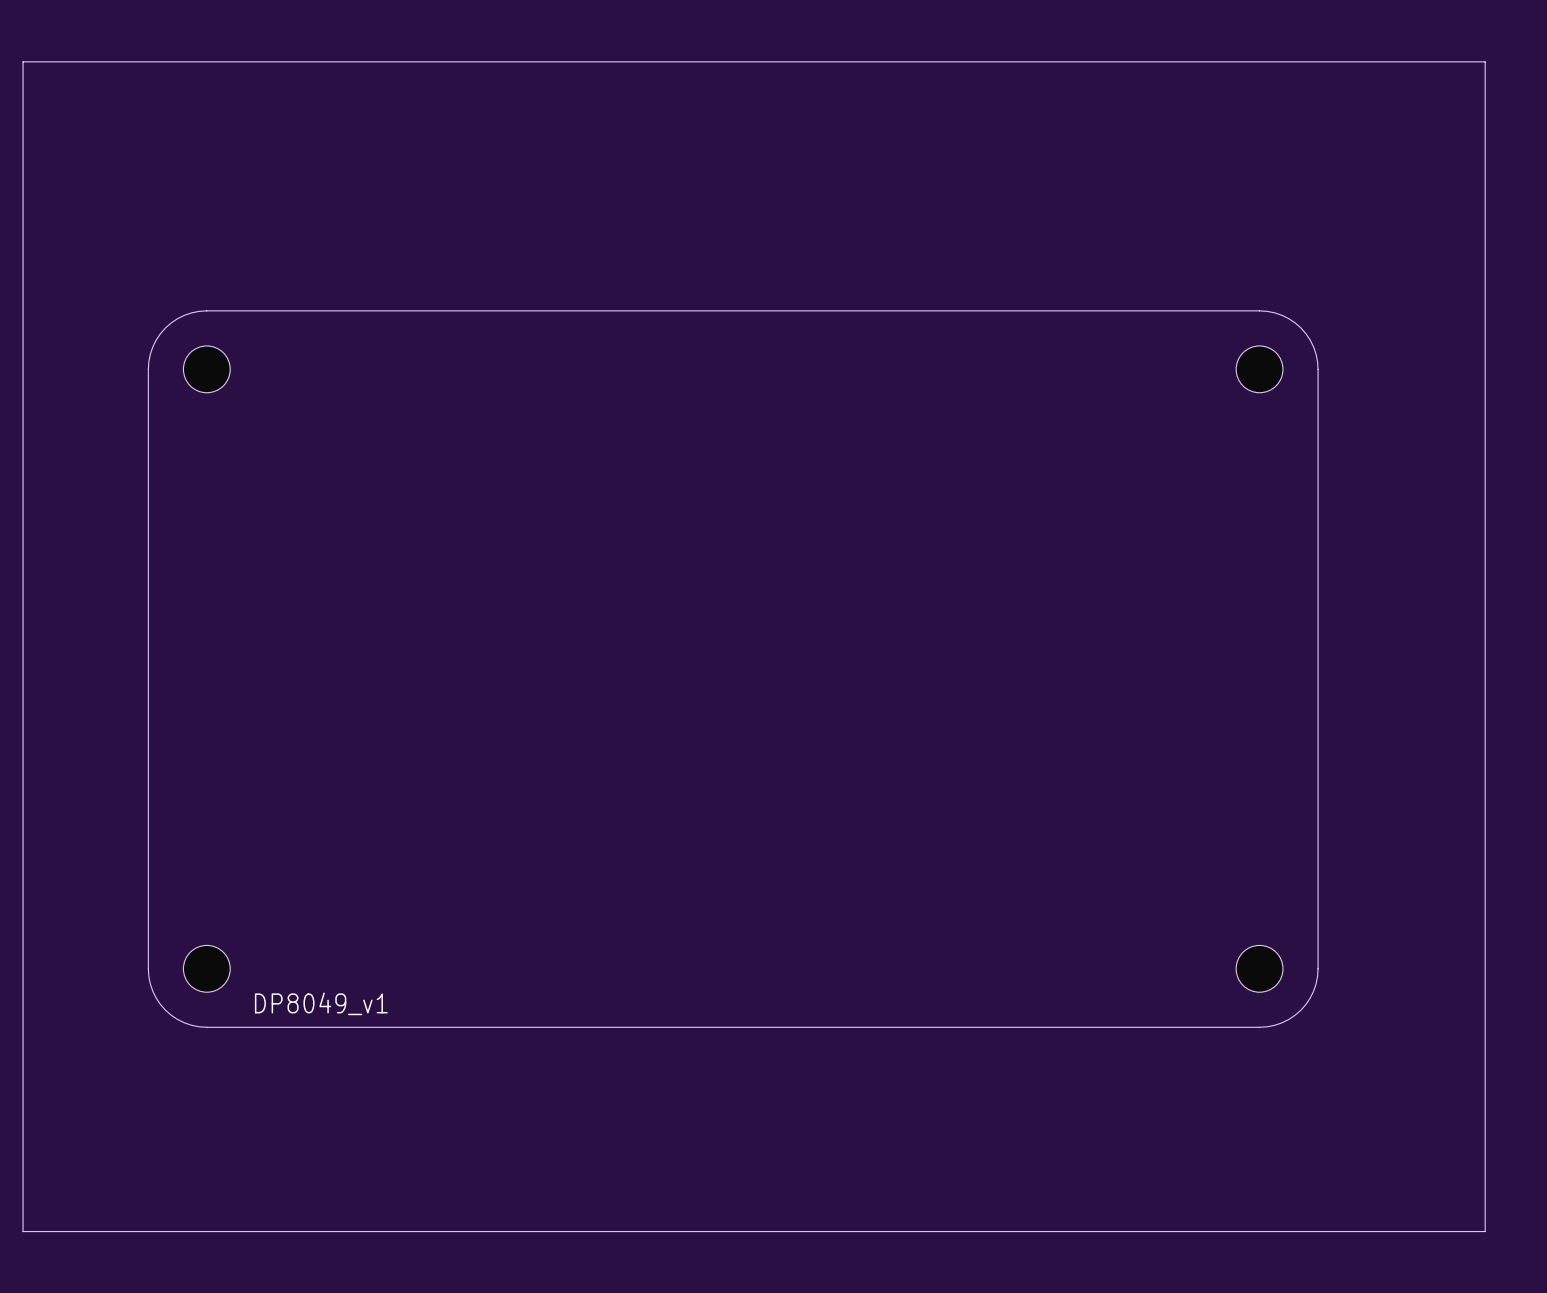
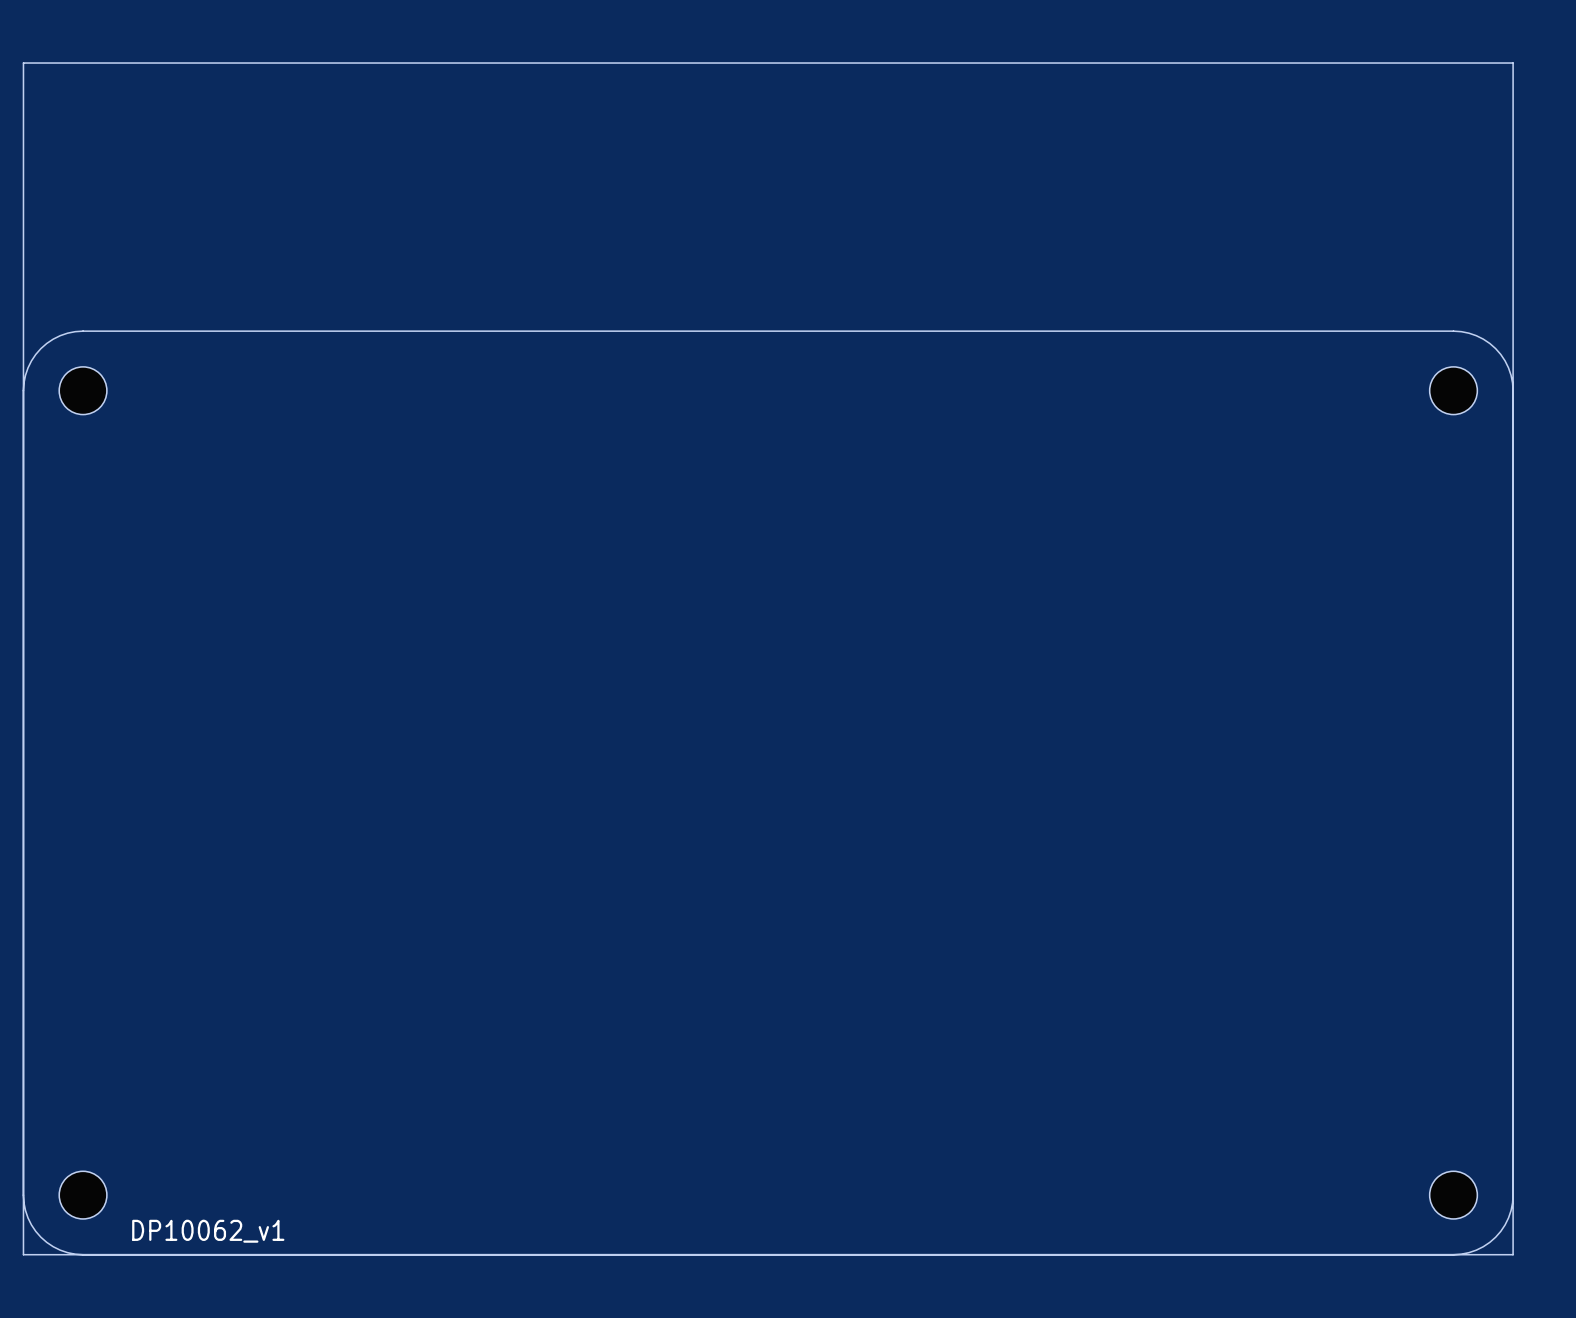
part: (733, 669) -> none
part: none -> (768, 792)

